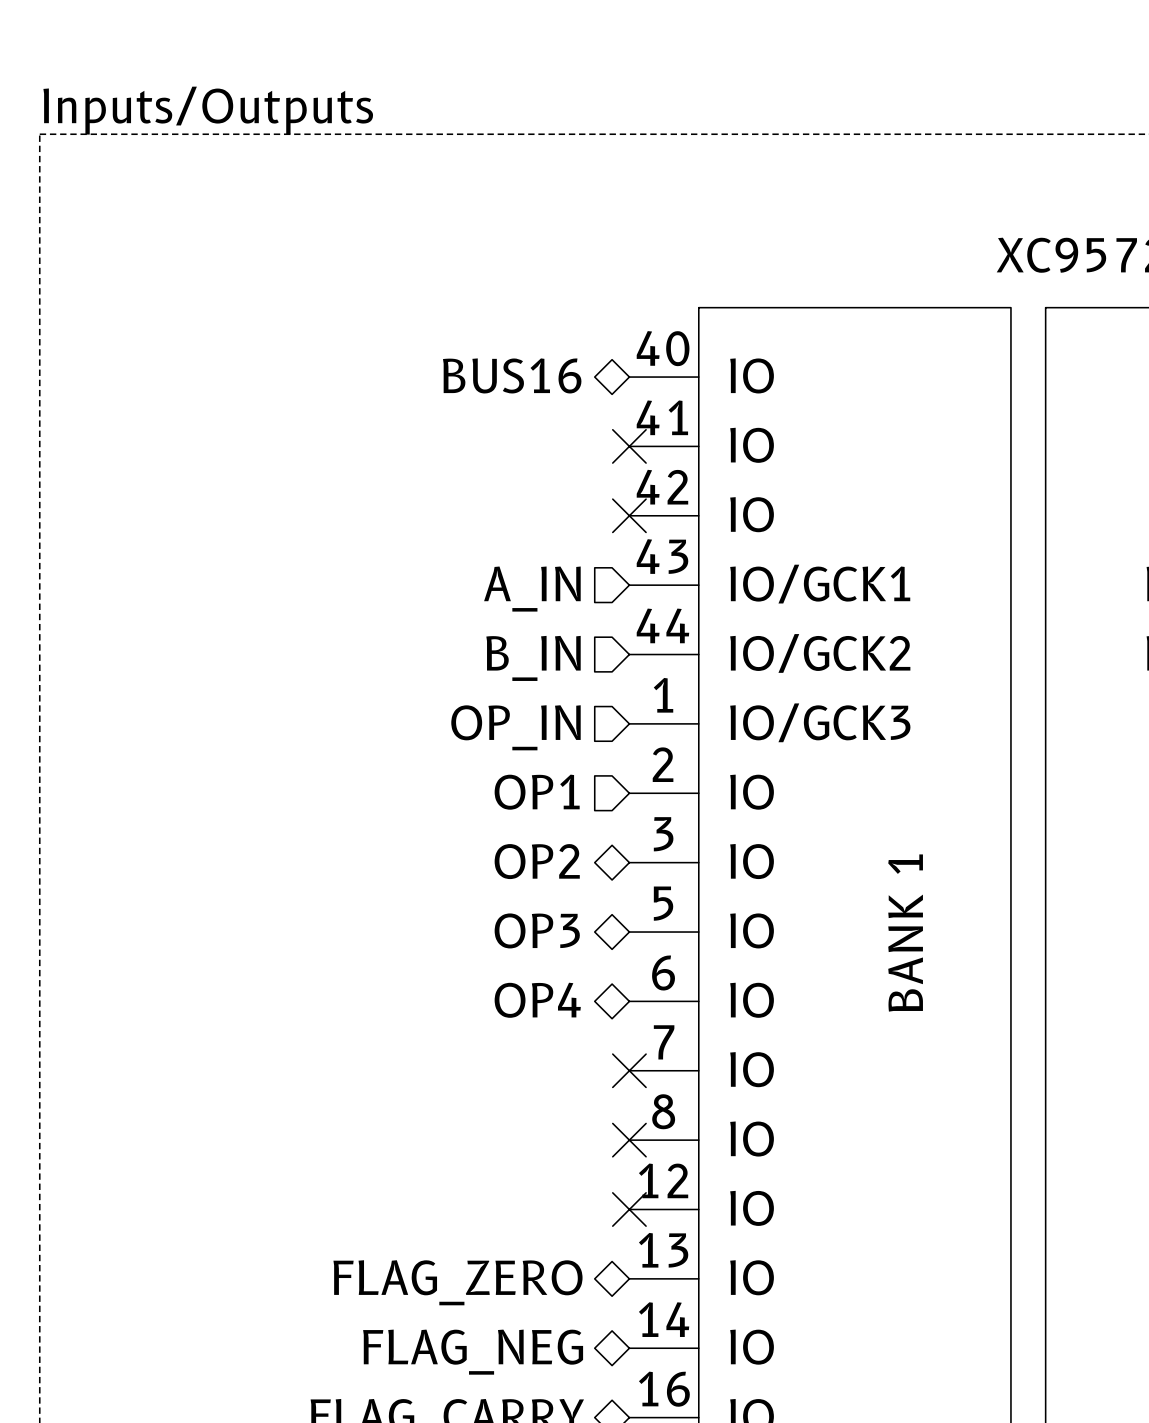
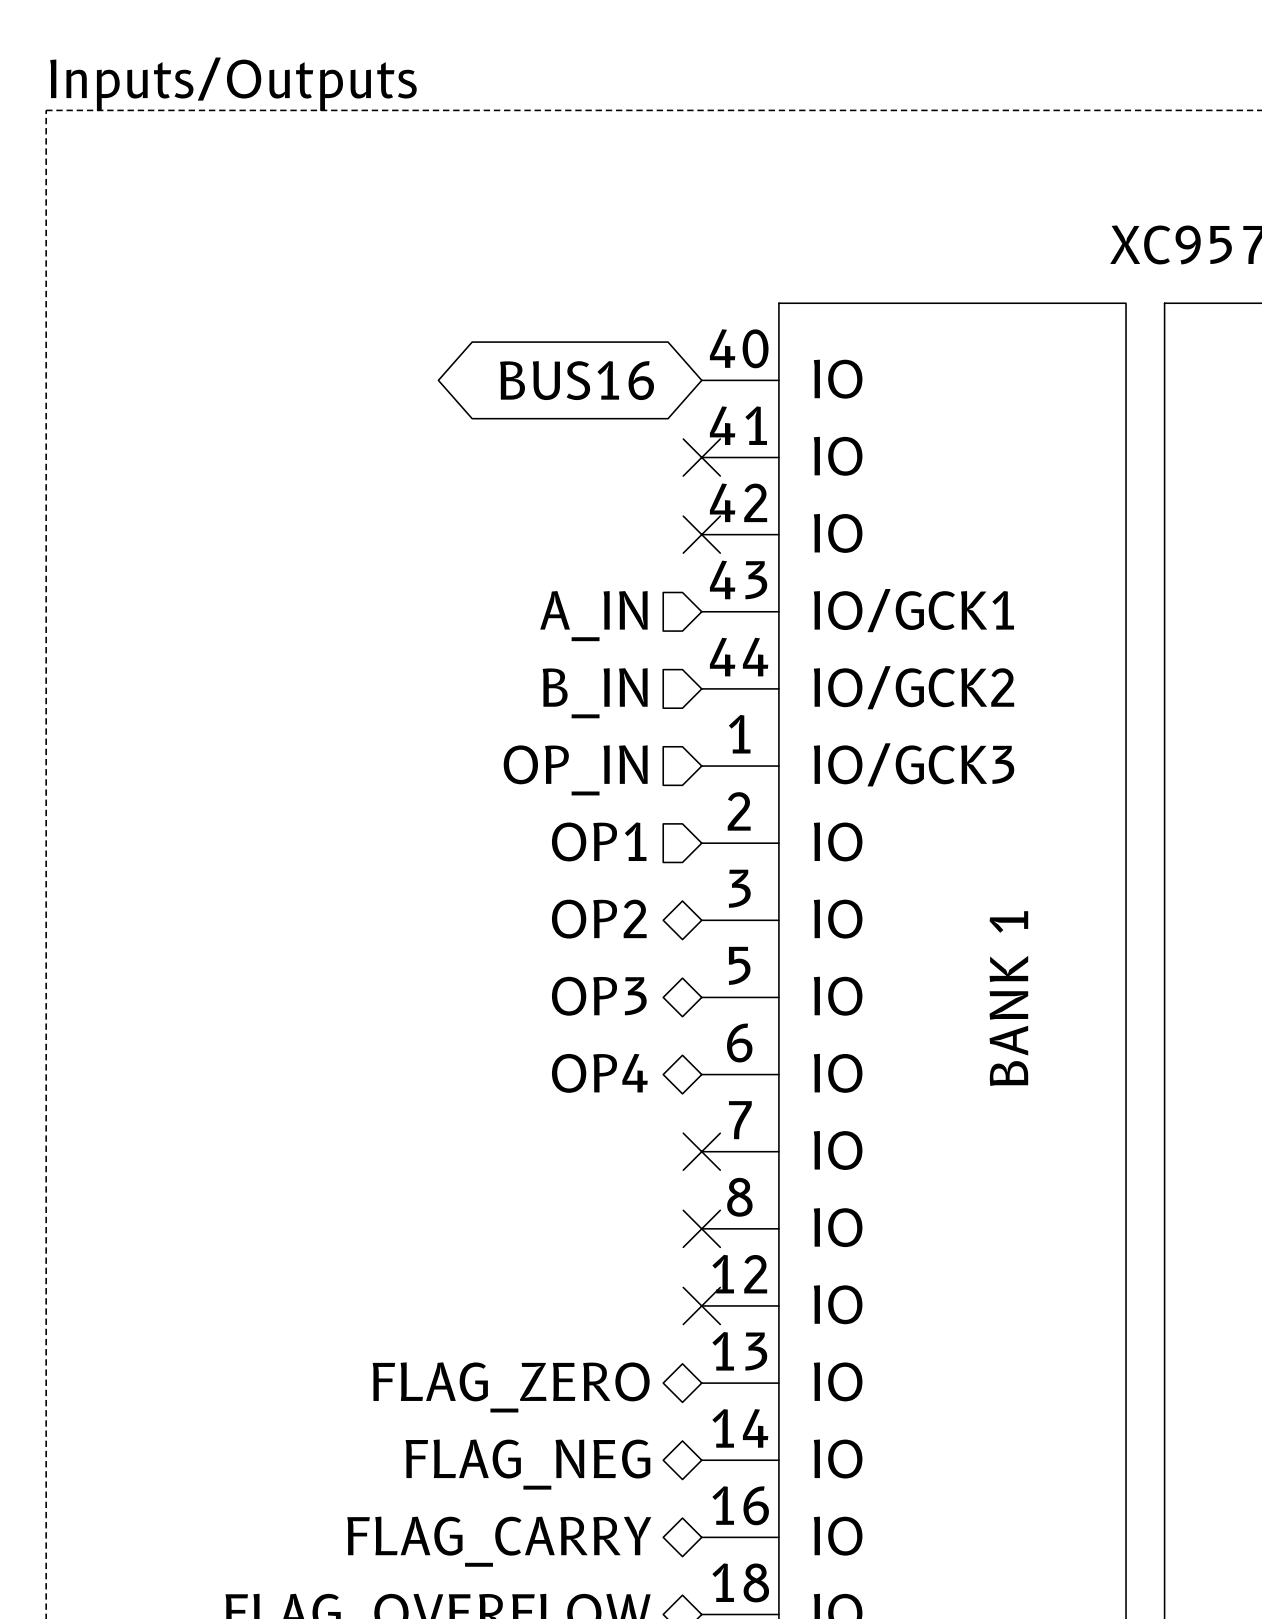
hierarchical label: BUS16 (512, 375) -> none
global label: none -> BUS16 (577, 380)

